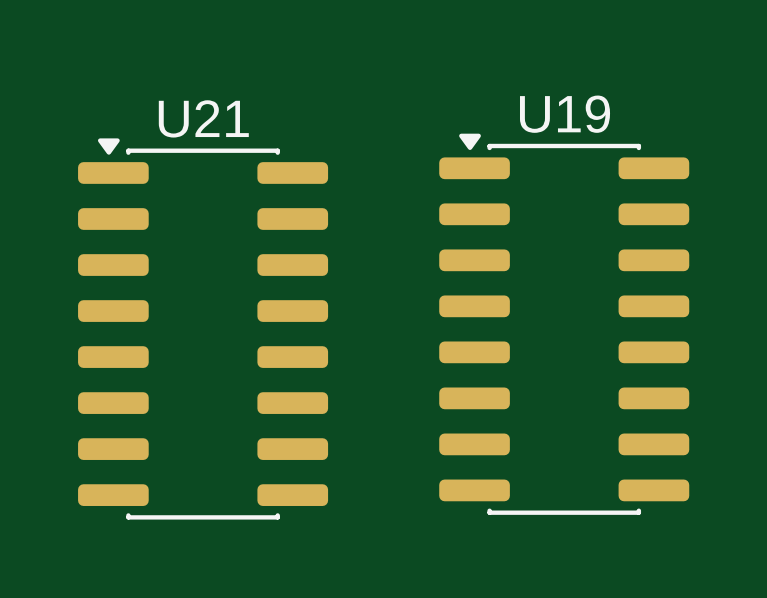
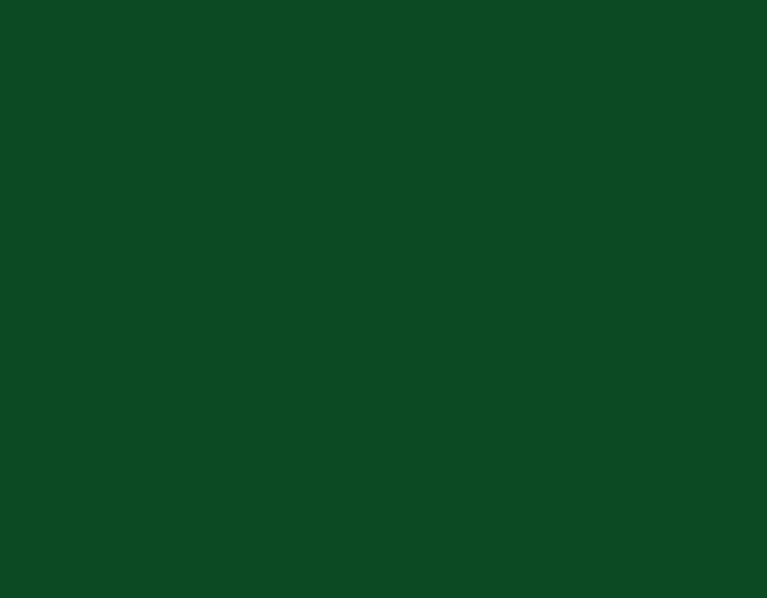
U19: (564, 324) -> none
U21: (203, 328) -> none

